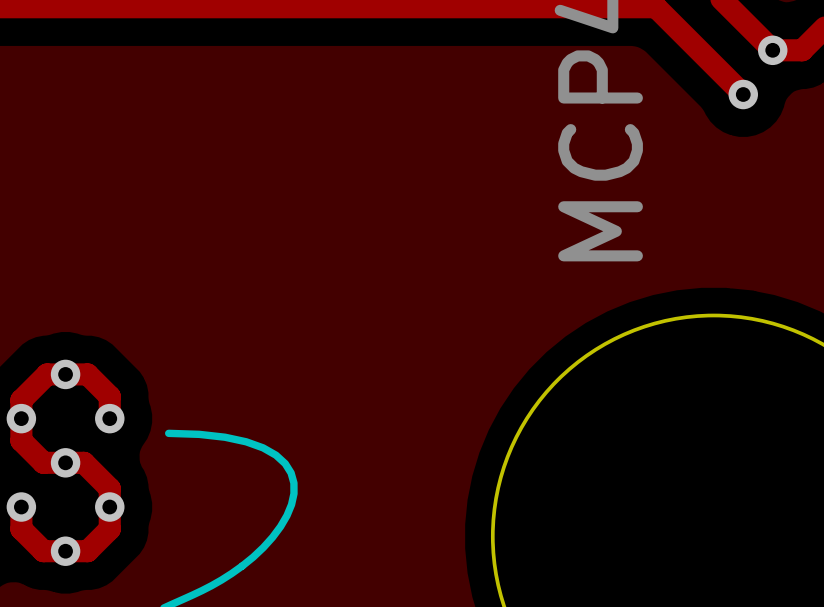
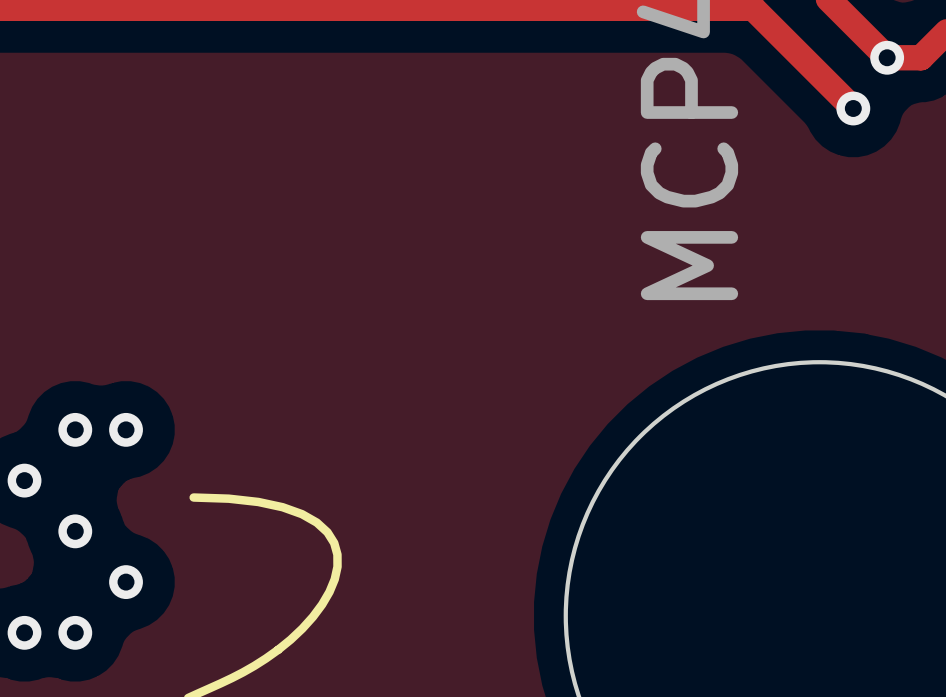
track: (109, 418) (109, 396) (87, 374) (47, 374) (21, 400) (21, 440) (43, 462) (83, 462) (109, 488) (109, 529) (87, 551) (43, 551) (21, 529) (21, 507) -> none
via position: (109, 418) -> (126, 429)
via position: (21, 507) -> (24, 632)

